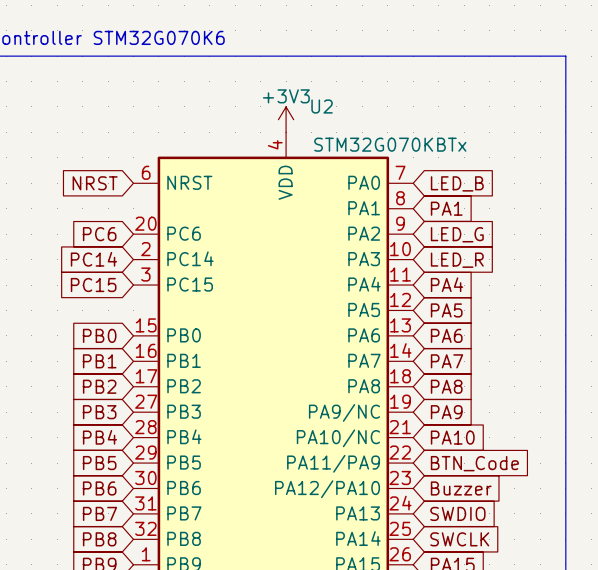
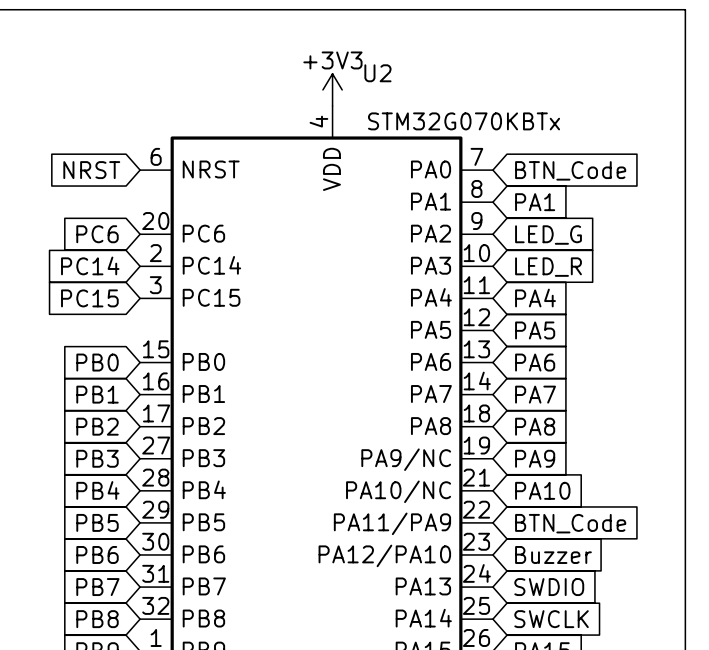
global label: LED_B (457, 183) -> BTN_Code (570, 170)

